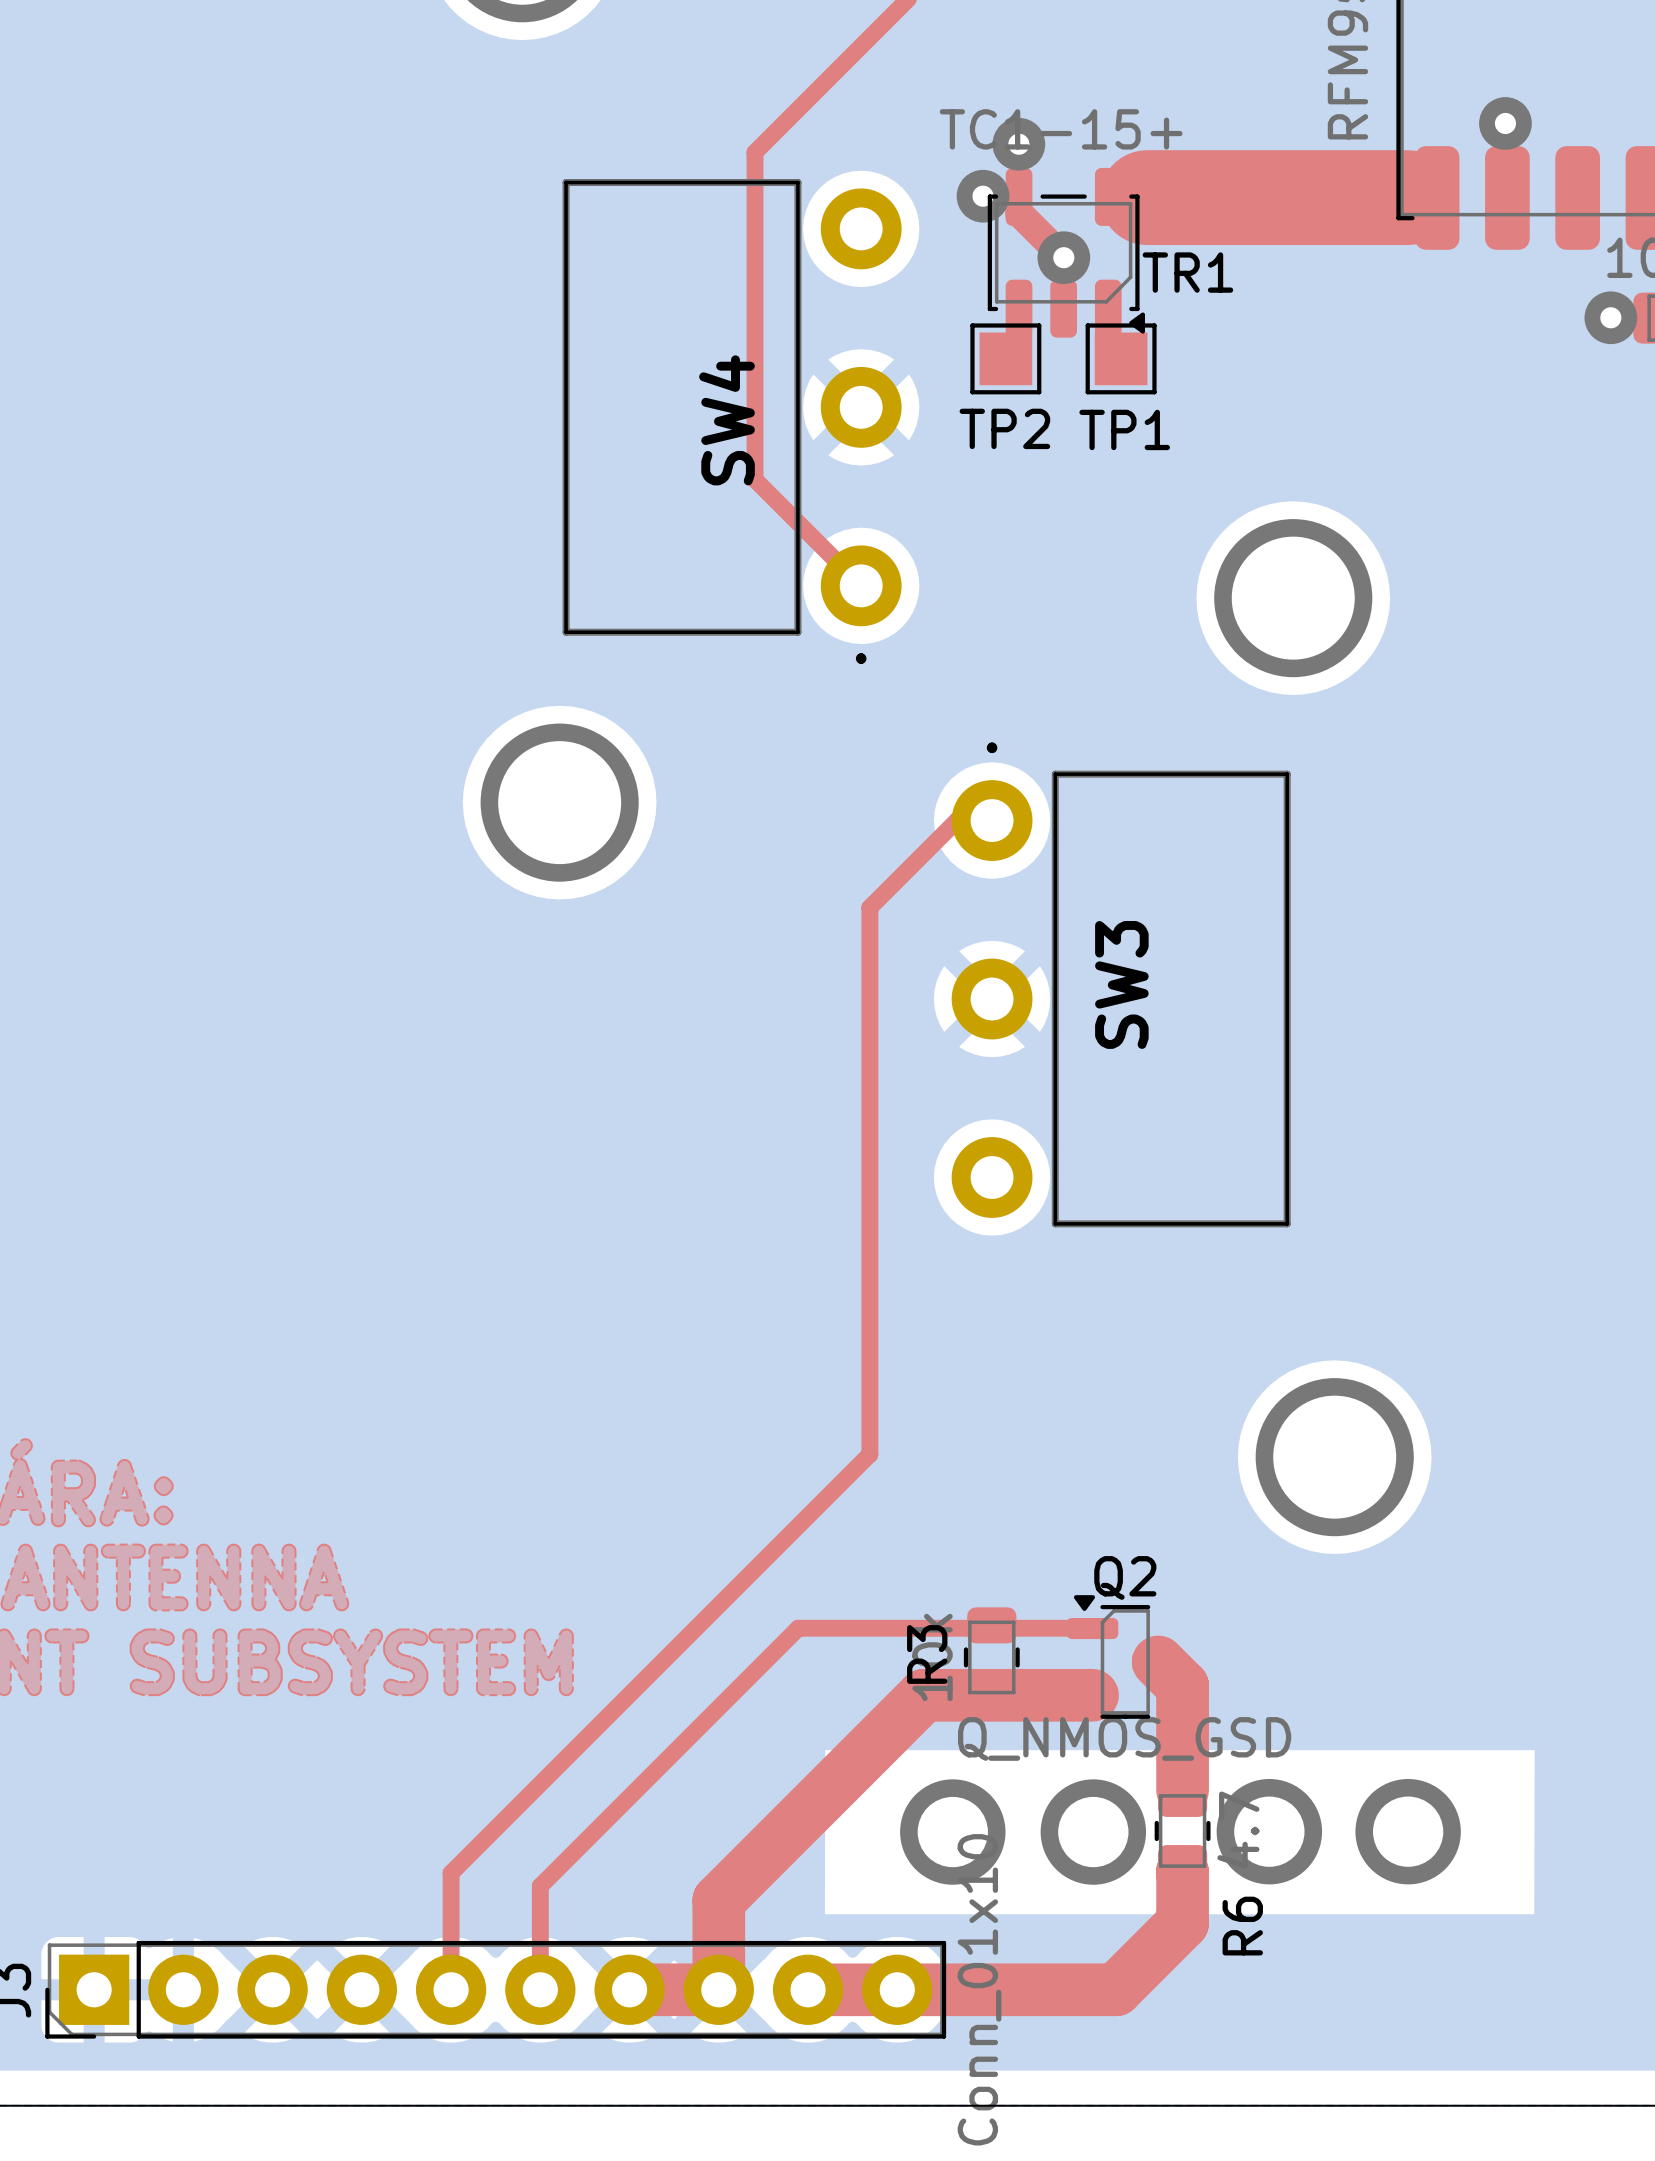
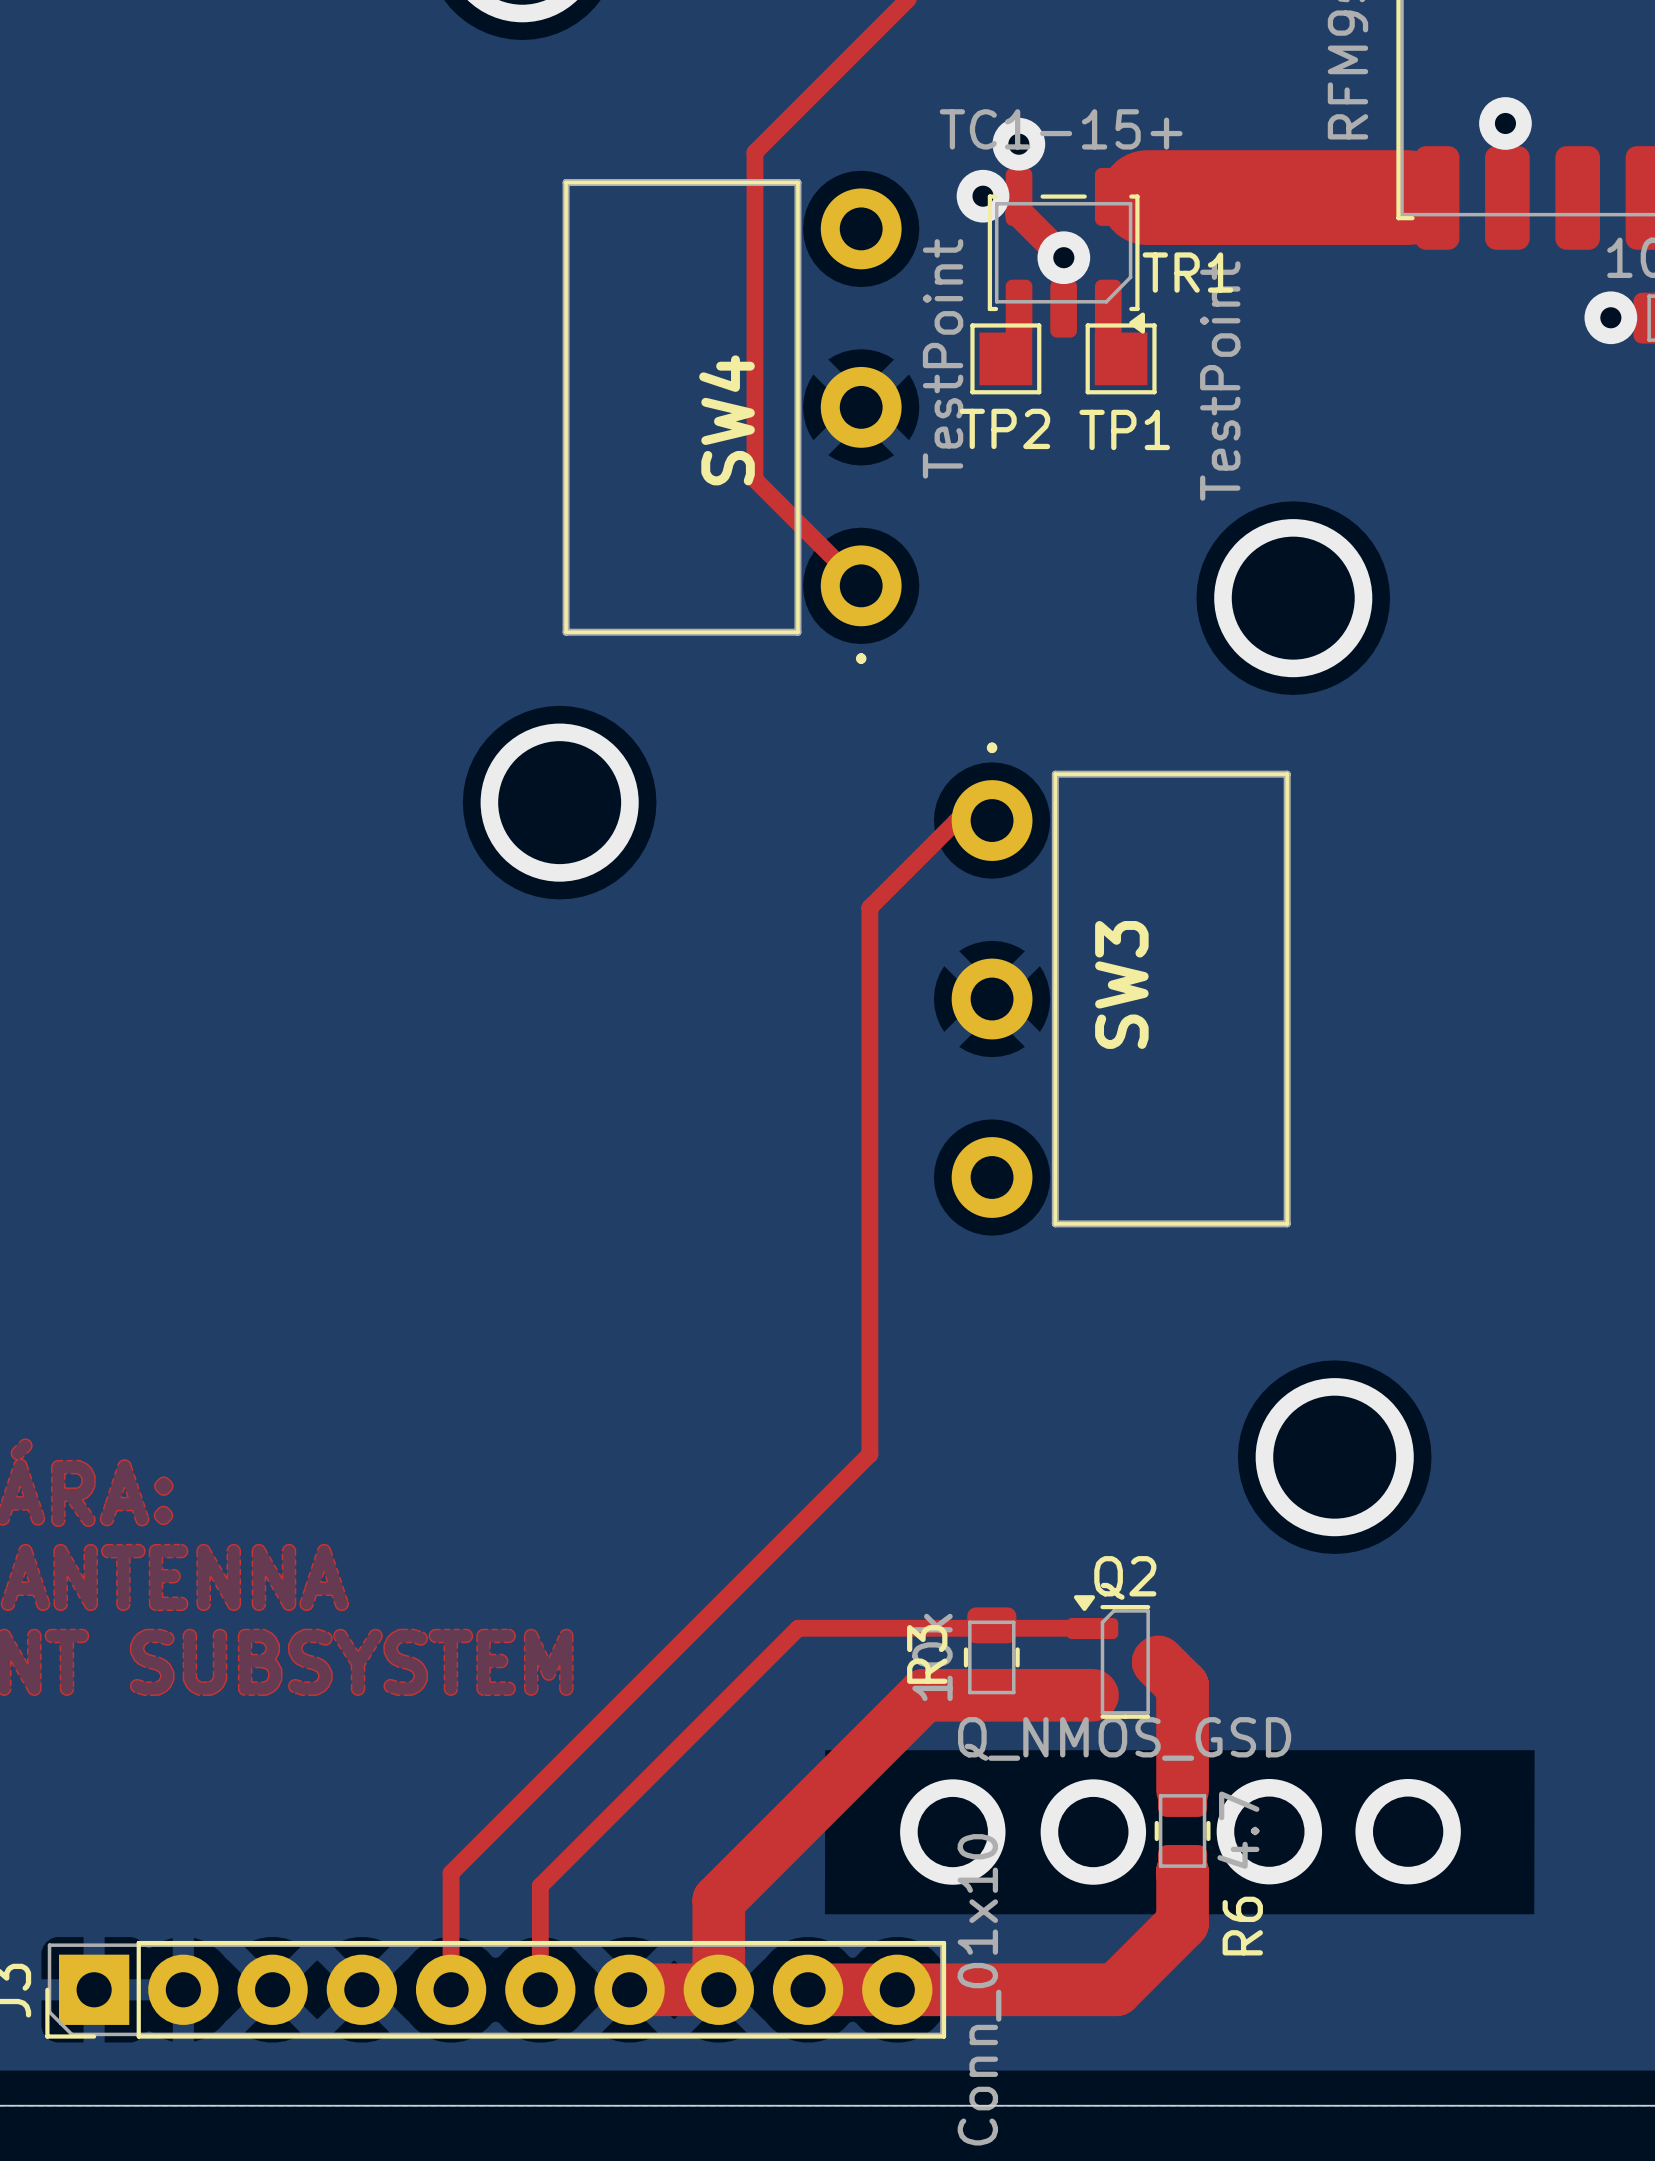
TP2 value: none -> TestPoint (943, 358)
TP1 value: none -> TestPoint (1220, 381)

